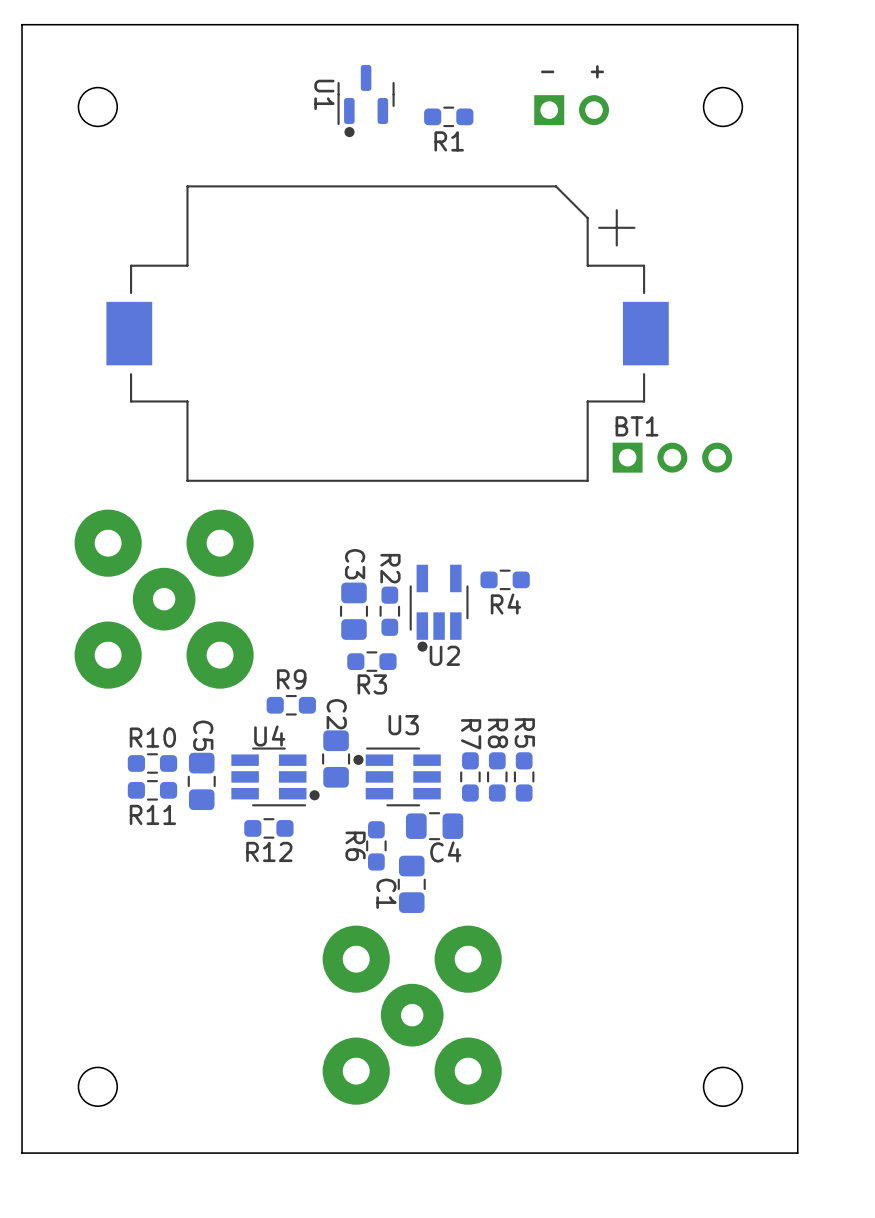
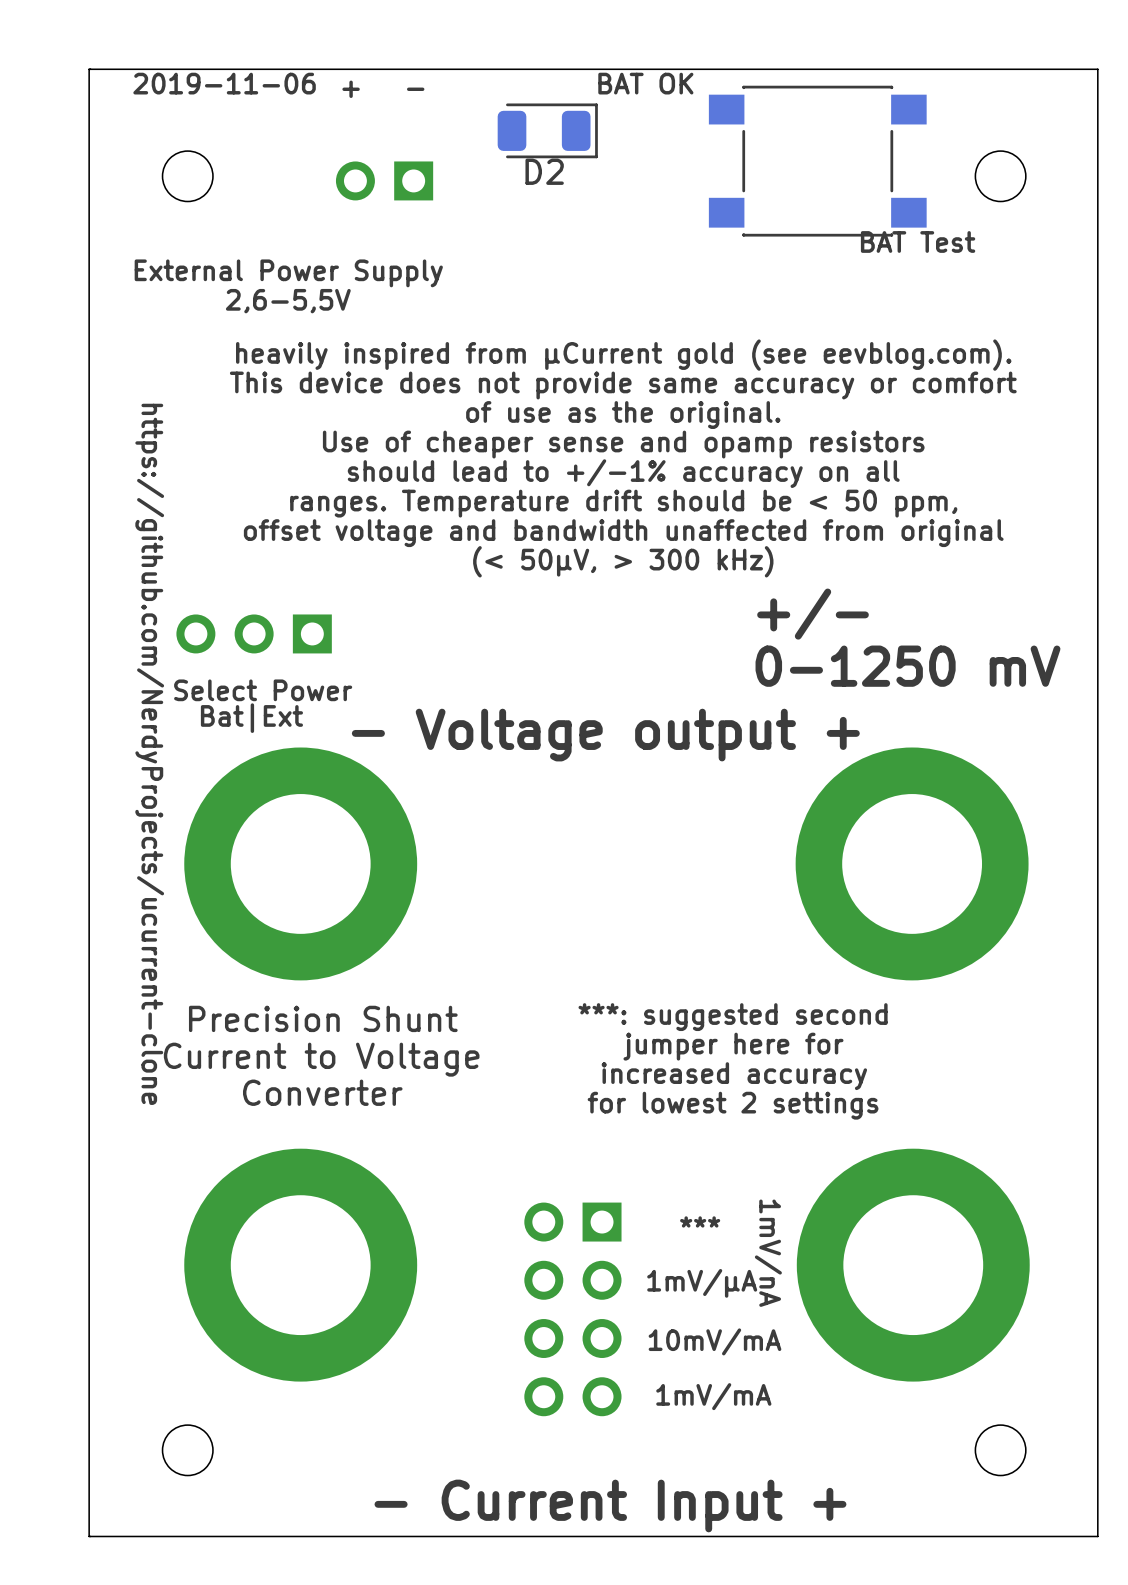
text: none -> 2019-11-06 (224, 83)
text: none -> BAT OK (645, 83)
text: none -> + - (383, 89)
text: - + (572, 71) -> none
D2: none -> (547, 130)
U1: (366, 94) -> none
part: none -> (817, 161)
part rotation: 0° (571, 110) -> 180° (384, 180)
part position: (571, 110) -> (384, 180)
R1: (448, 116) -> none
drawing: [344, 127, 355, 138] -> none
text: none -> BAT Test (918, 241)
text: none -> External Power Supply (288, 273)
text: none -> 2,6-5,5V (288, 301)
text: none -> heavily inspired from µCurrent gold (see eevblog.com). (623, 355)
text: none -> This device does not provide same accuracy or comfort (623, 385)
text: none -> of use as the original. (623, 415)
text: none -> Use of cheaper sense and opamp resistors (623, 444)
BT1: (387, 333) -> none
text: none -> should lead to +/-1% accuracy on all (623, 473)
text: none -> ranges. Temperature drift should be < 50 ppm, (623, 503)
text: none -> offset voltage and bandwidth unaffected from original (623, 533)
text: none -> (< 50µV, > 300 kHz) (623, 561)
text: none -> +/- (813, 614)
part: (672, 457) -> none
part: none -> (254, 633)
text: none -> 0-1250 mV (907, 666)
text: none -> Select Power (263, 690)
text: none -> Bat|Ext (251, 718)
text: none -> - Voltage output + (605, 735)
text: none -> https://github.com/NerdyProjects/ucurrent-clone (149, 754)
R4: (505, 579) -> none
part: (164, 599) -> none
U2: (439, 602) -> none
C3: (353, 611) -> none
R2: (389, 611) -> none
part: none -> (300, 863)
part: none -> (912, 863)
drawing: [417, 641, 428, 652] -> none
R3: (371, 661) -> none
R9: (291, 705) -> none
text: none -> ***: suggested second (733, 1017)
drawing: [353, 754, 364, 765] -> none
text: none -> Precision Shunt (323, 1018)
C2: (336, 759) -> none
R10: (152, 763) -> none
U4: (268, 776) -> none
U3: (403, 776) -> none
R7: (470, 776) -> none
R8: (497, 776) -> none
text: none -> jumper here for (733, 1046)
R5: (524, 776) -> none
C5: (201, 781) -> none
text: none -> Current to Voltage (321, 1059)
R11: (152, 790) -> none
drawing: [309, 790, 320, 801] -> none
text: none -> increased accuracy (734, 1076)
text: none -> Converter (322, 1092)
text: none -> for lowest 2 settings (733, 1105)
C4: (434, 826) -> none
R12: (268, 828) -> none
R6: (376, 845) -> none
C1: (411, 884) -> none
text: none -> *** (700, 1221)
text: none -> 1mV/nA (768, 1253)
part: none -> (300, 1265)
part: none -> (913, 1265)
text: none -> 1mV/µA (702, 1283)
part: none -> (572, 1309)
text: none -> 10mV/mA (715, 1341)
part: (412, 1015) -> none
text: none -> 1mV/mA (713, 1396)
text: none -> - Current Input + (610, 1505)

